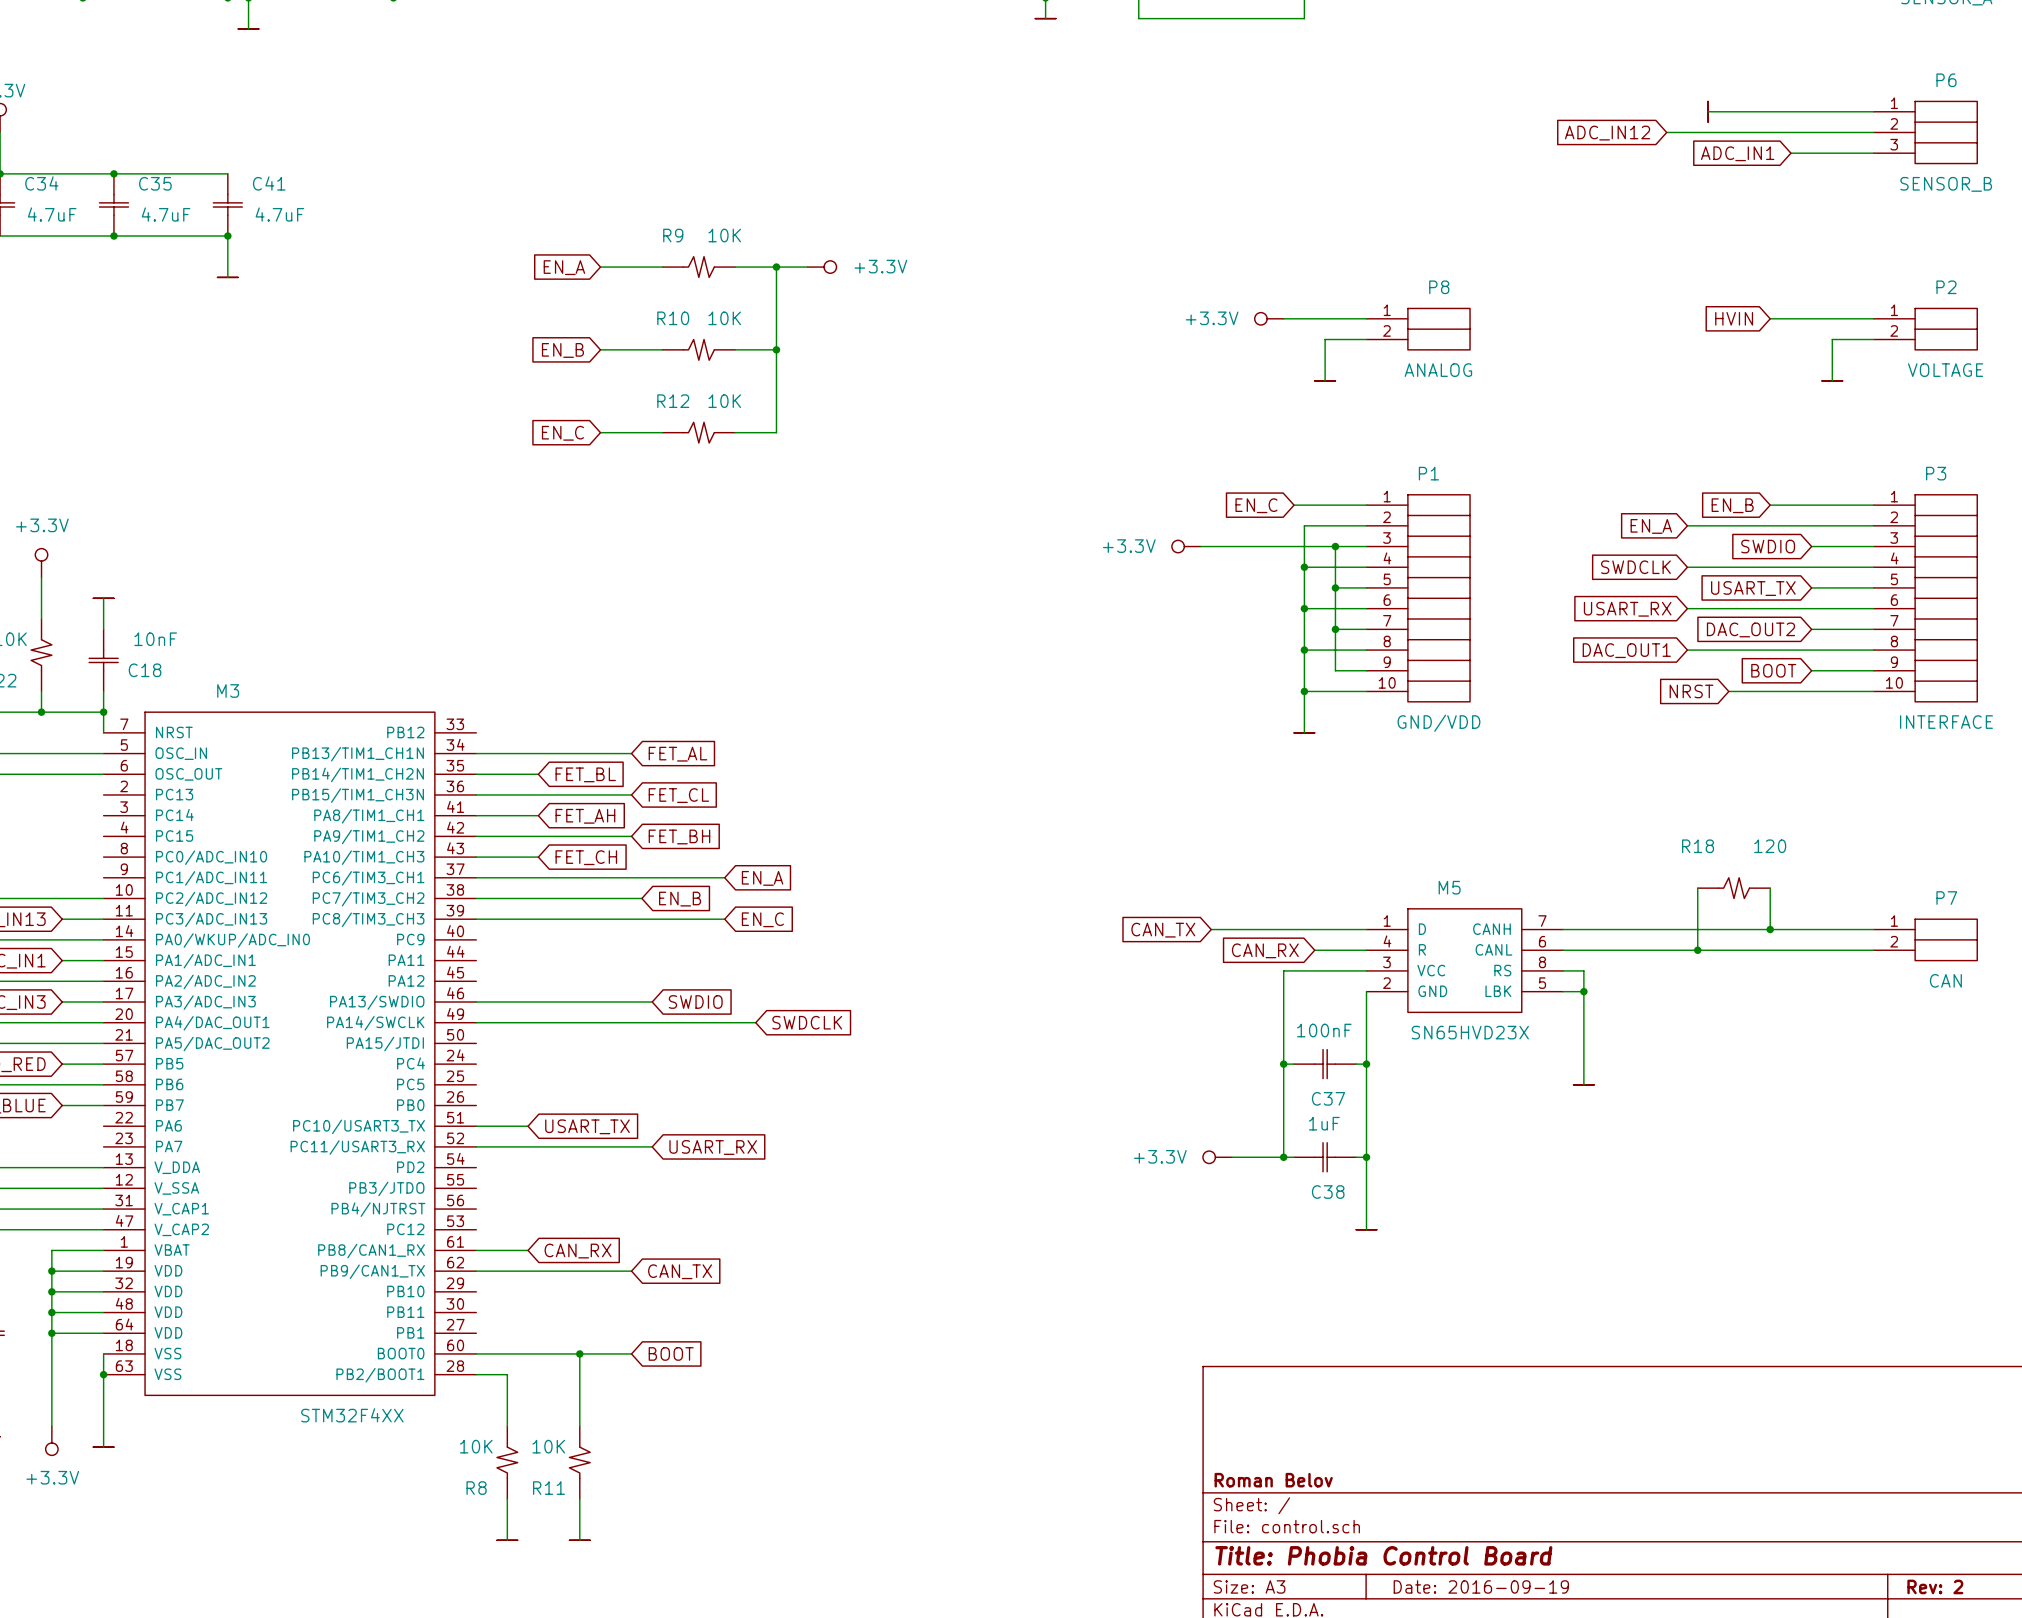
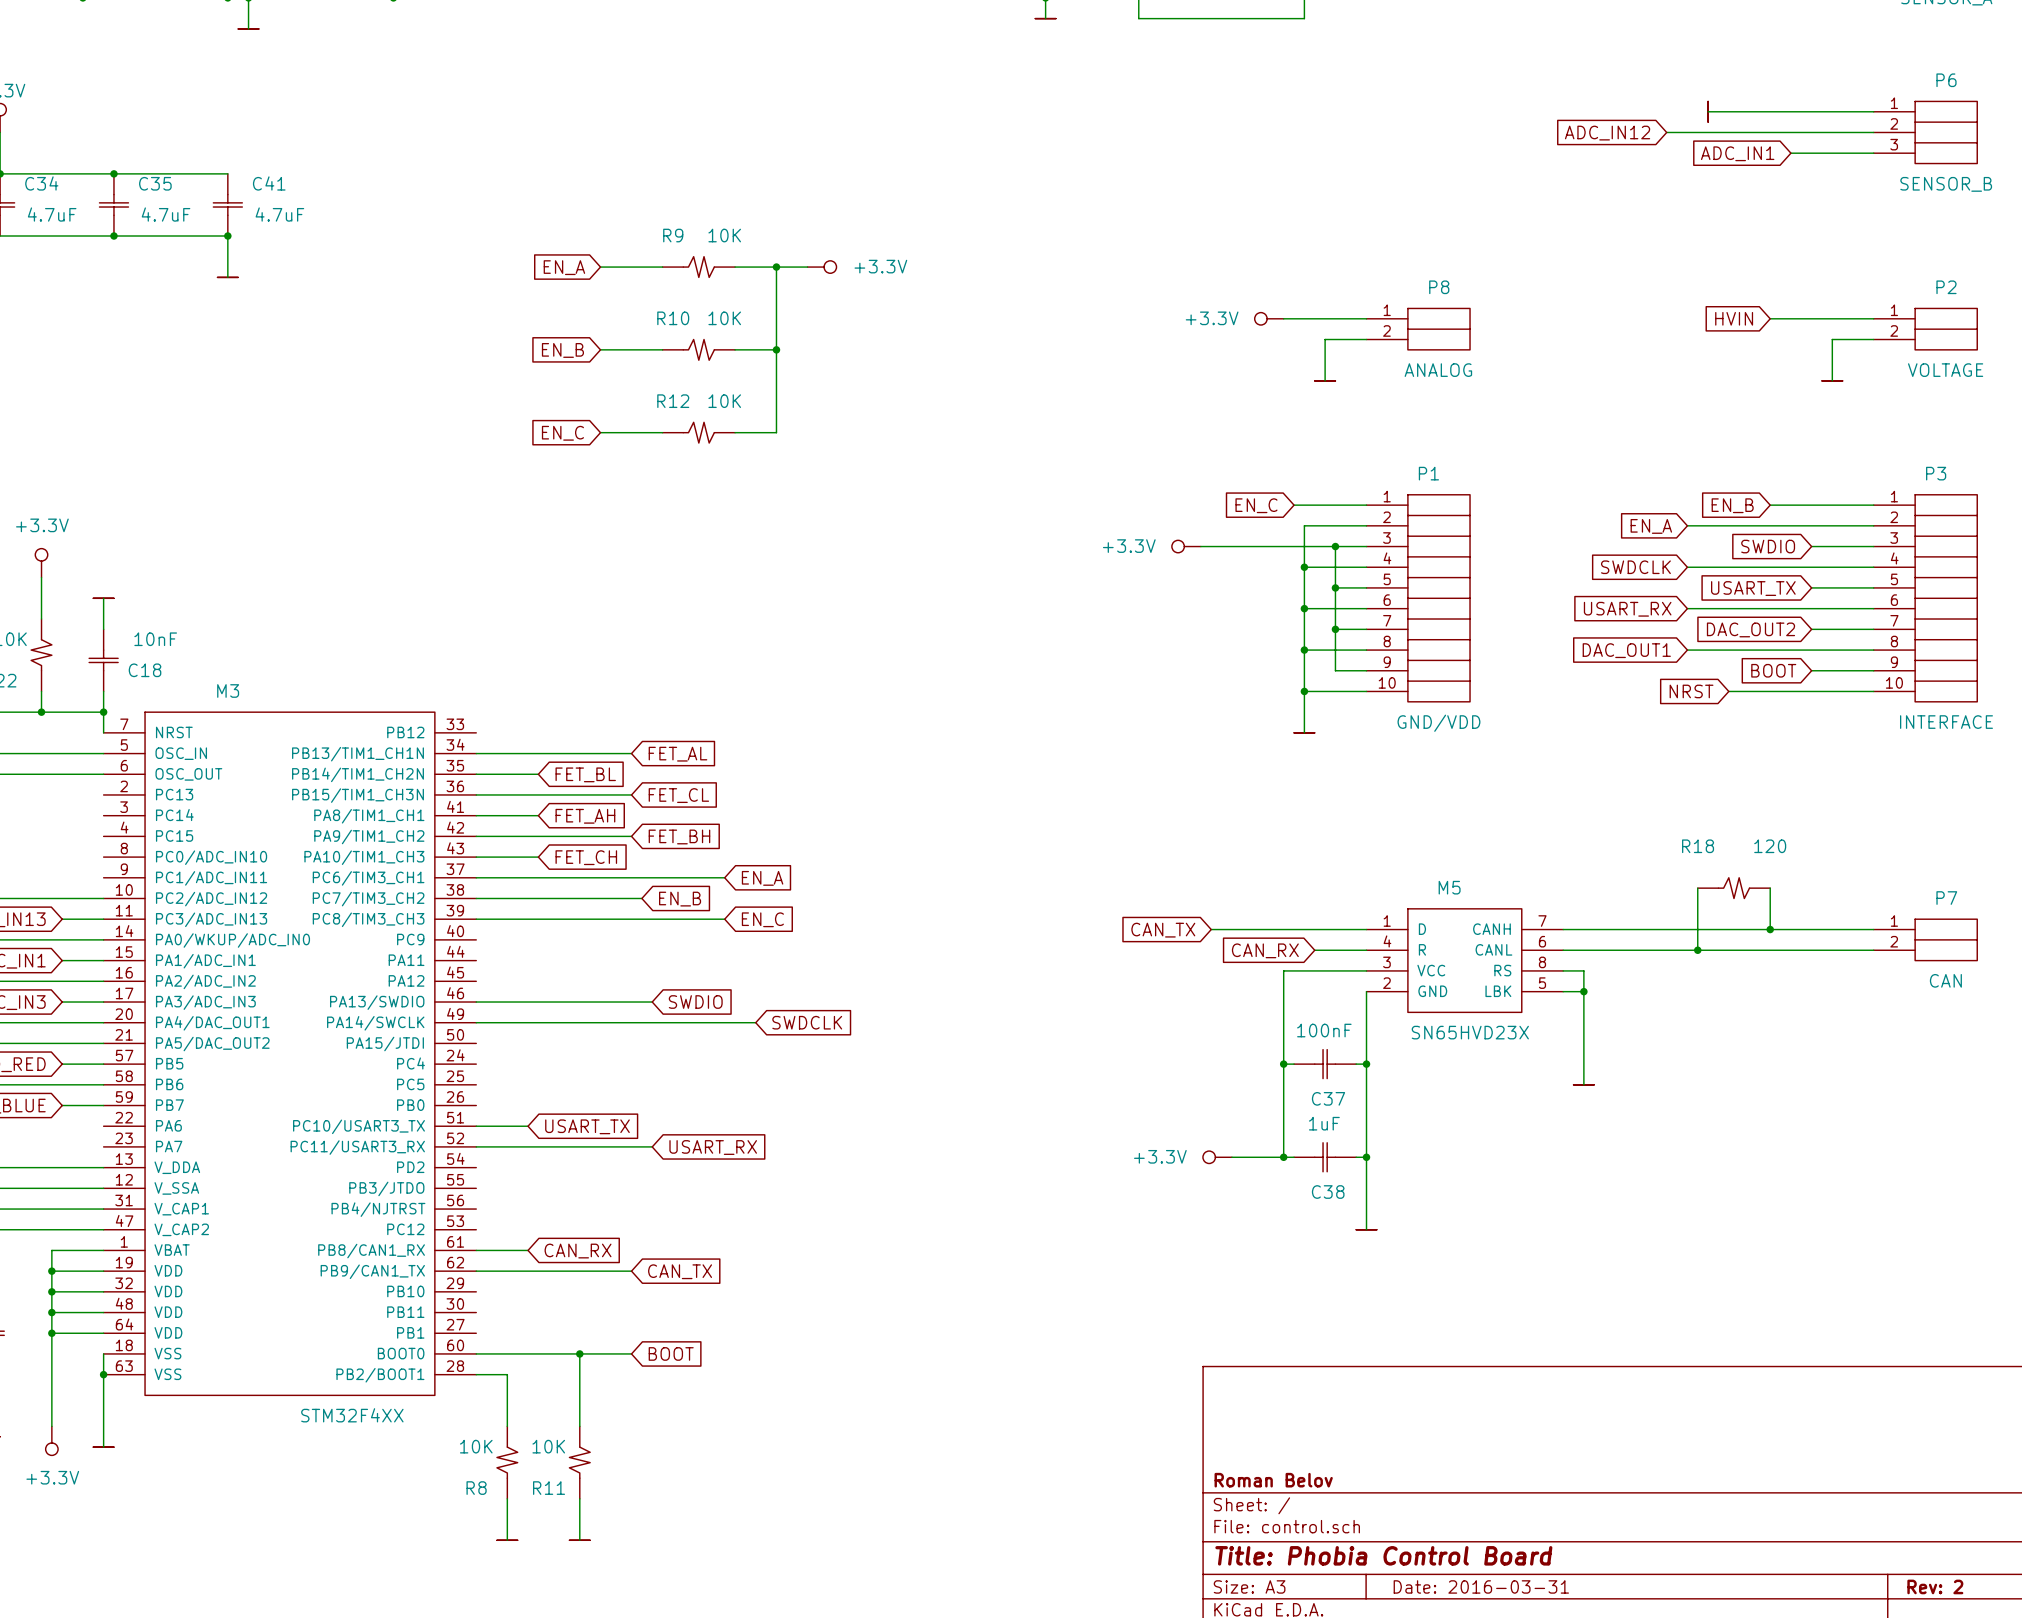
title block: Date: 2016-09-19 (1481, 1586) -> Date: 2016-03-31 (1481, 1586)

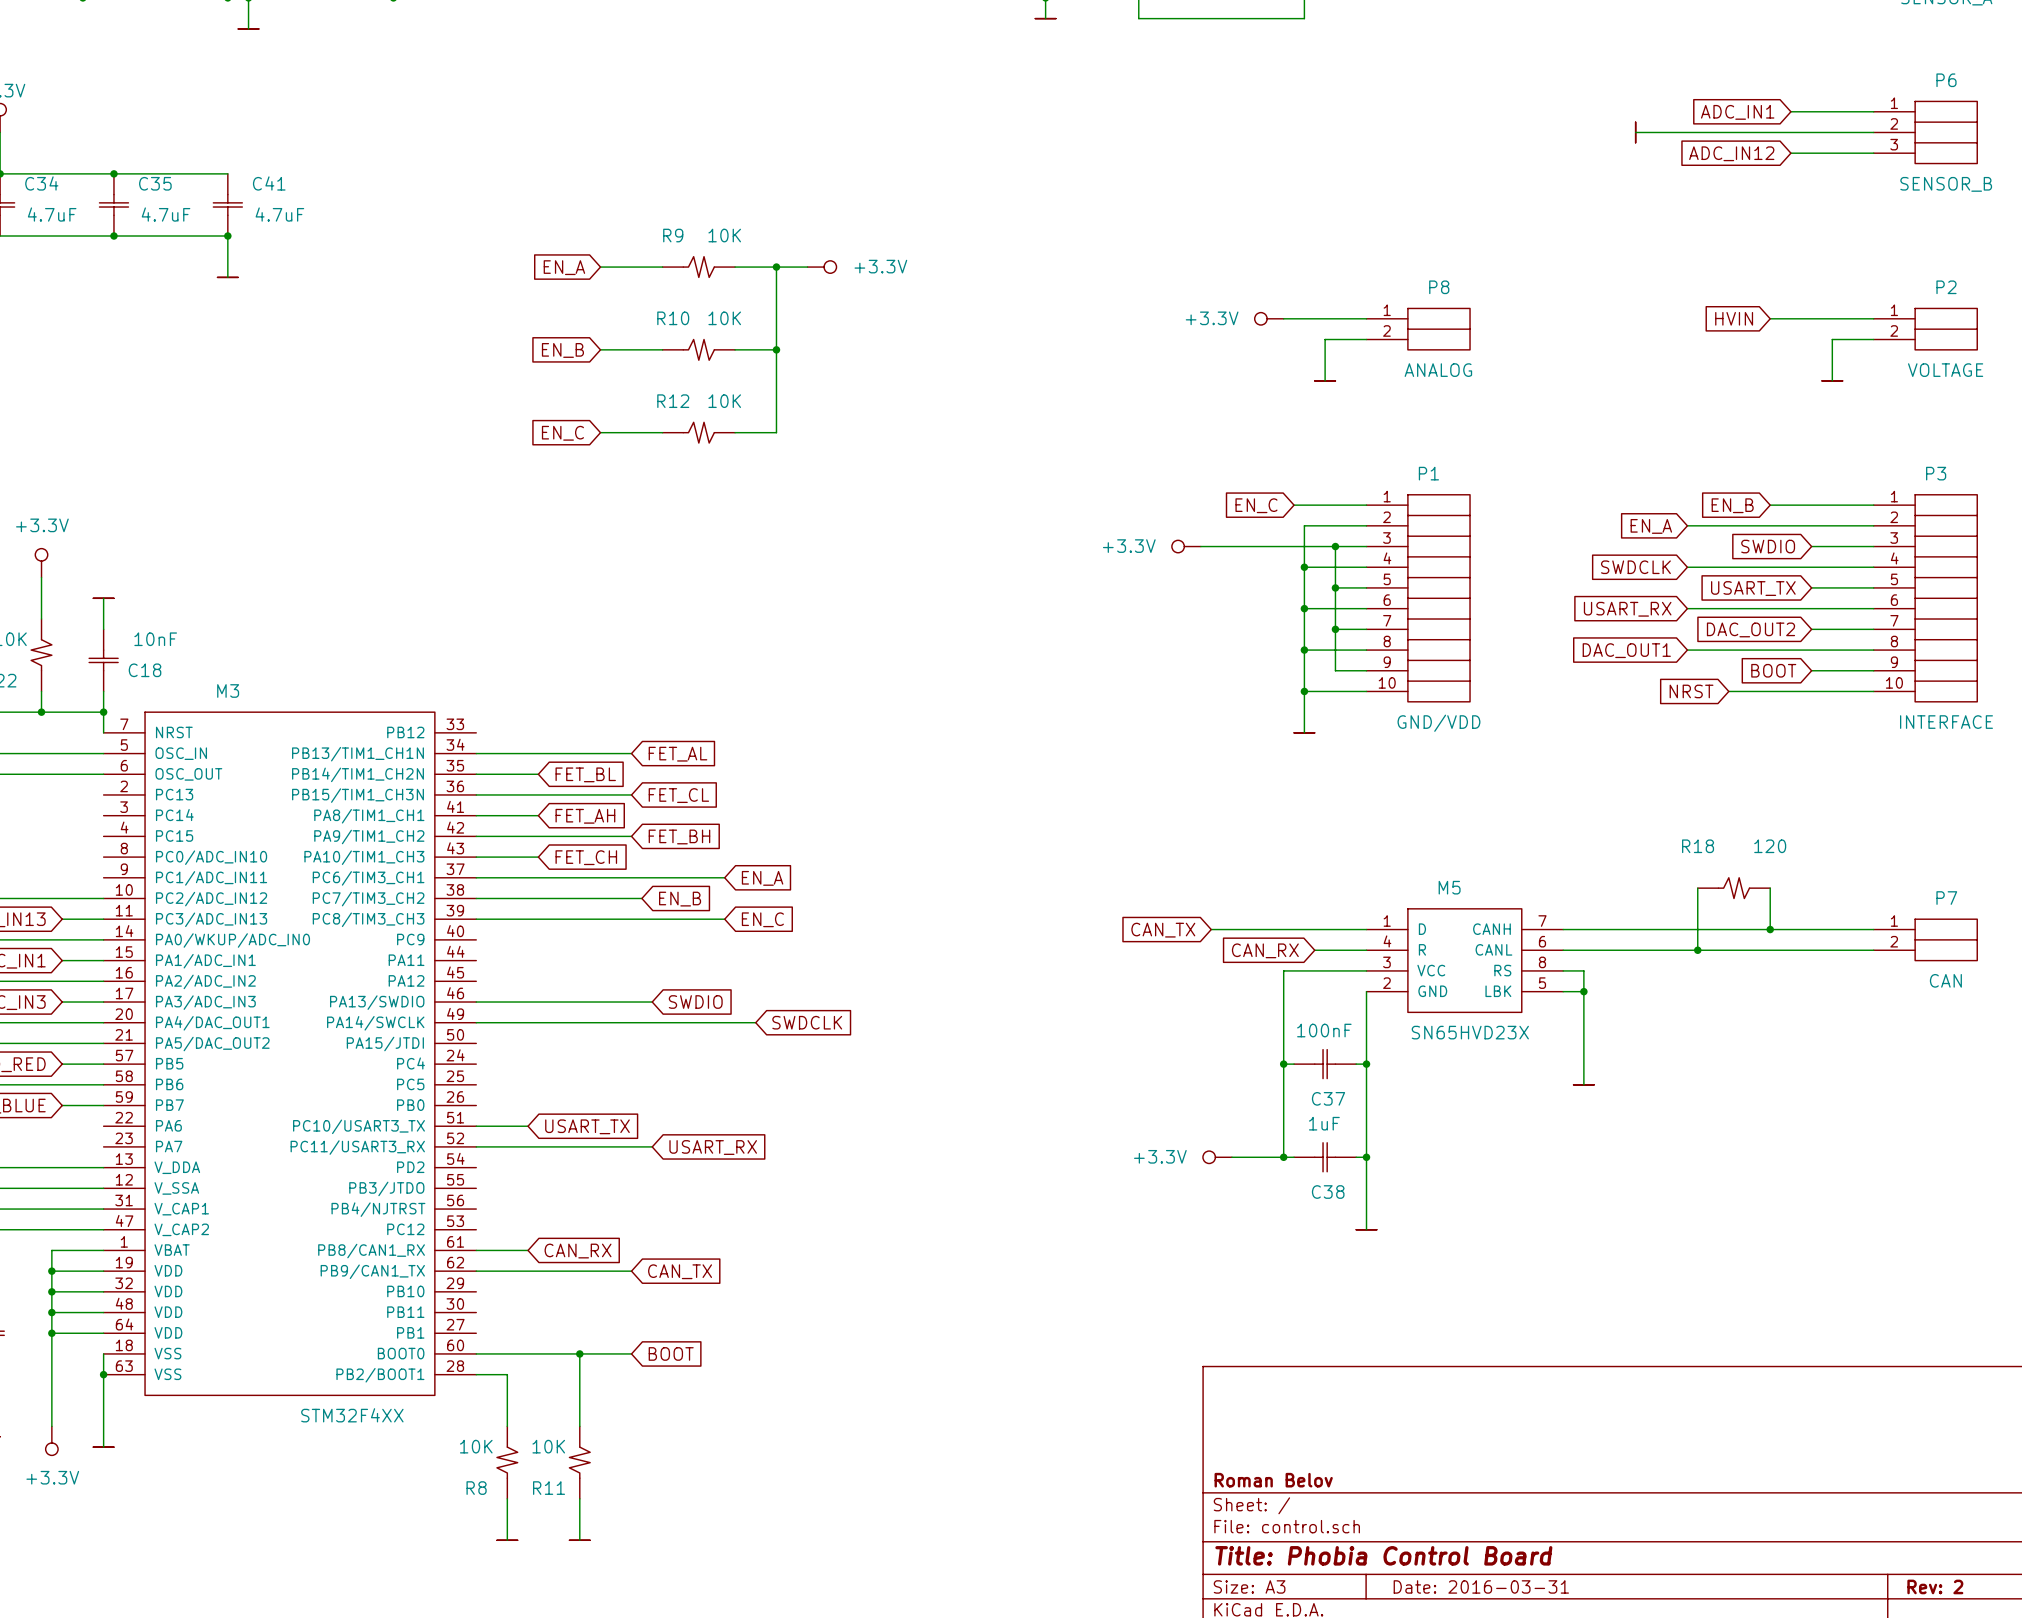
wire: (1708, 111) (1790, 111) -> none
power symbol position: (1708, 111) -> (1635, 132)
global label: none -> ADC_IN1 (1737, 112)
wire: none -> (1635, 132) (1666, 132)
global label: ADC_IN12 (1607, 133) -> none
global label: ADC_IN1 (1737, 153) -> ADC_IN12 (1731, 153)

